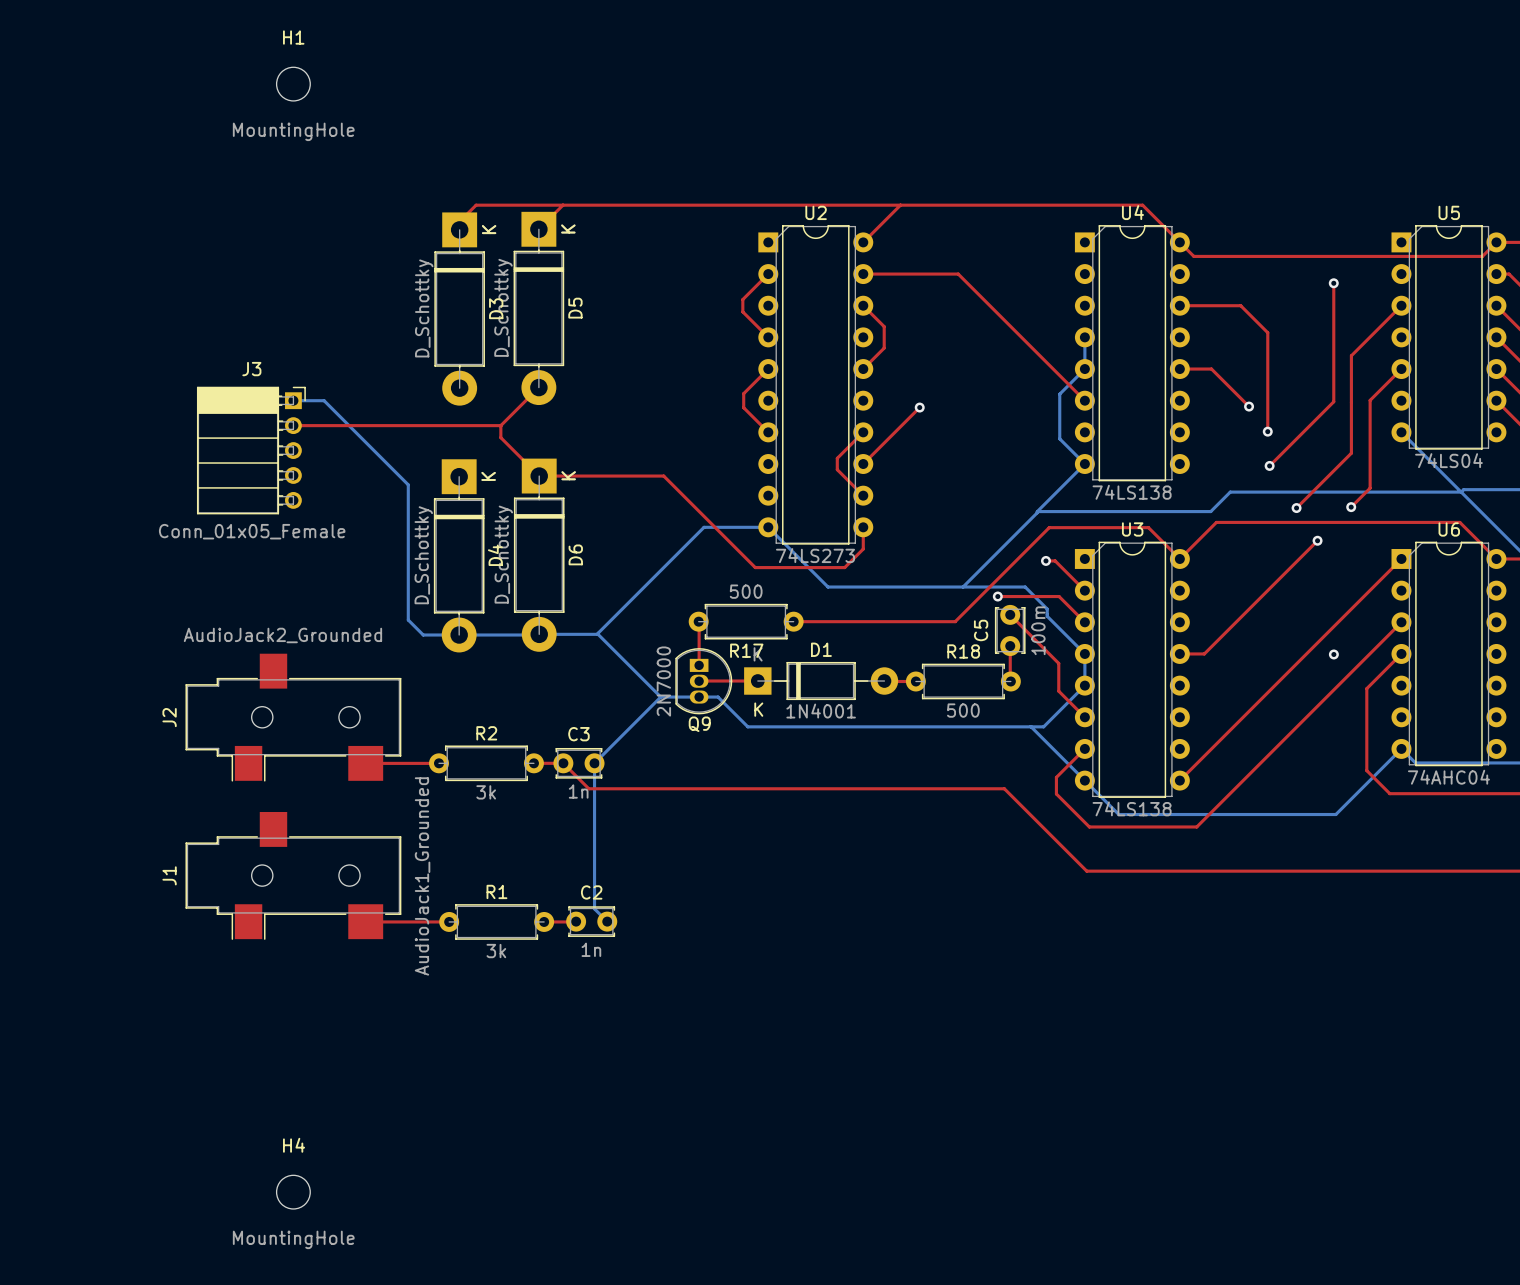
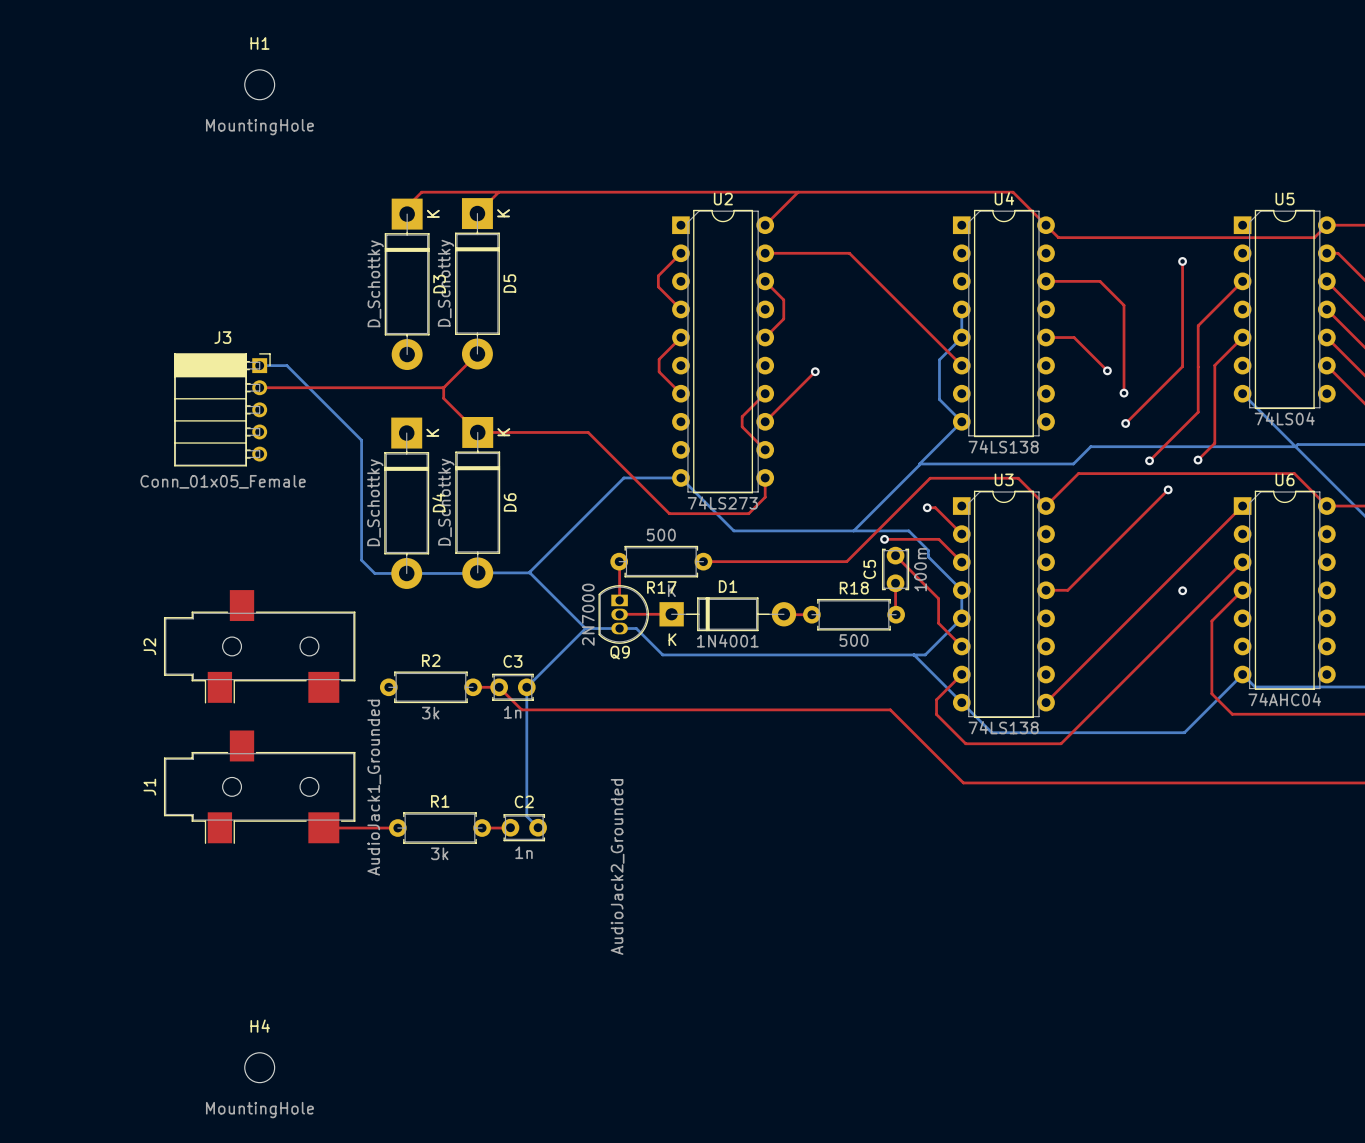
J2 value rotation: 0° (282, 635) -> 90° counterclockwise (617, 866)
J2 value position: AudioJack2_Grounded (282, 635) -> AudioJack2_Grounded (617, 866)
top track: (365, 763) (438, 763) -> none

